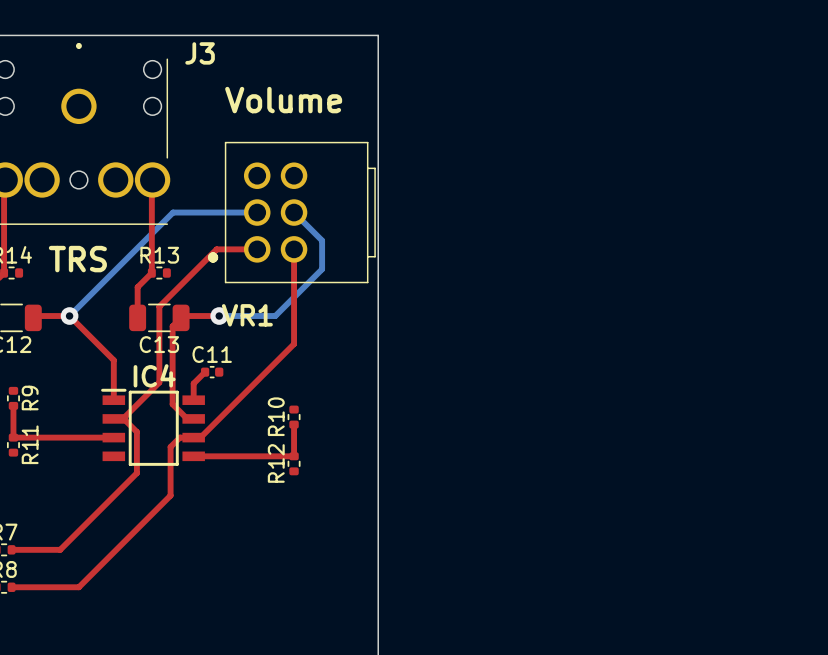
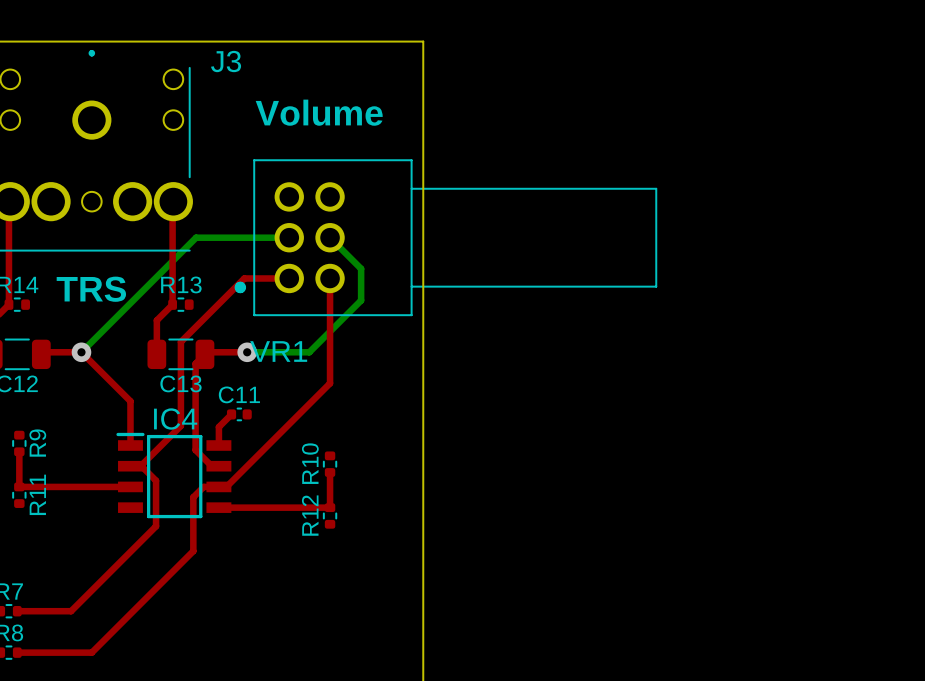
VR1 footprint: [207, 141, 376, 284] -> [234, 159, 658, 316]

